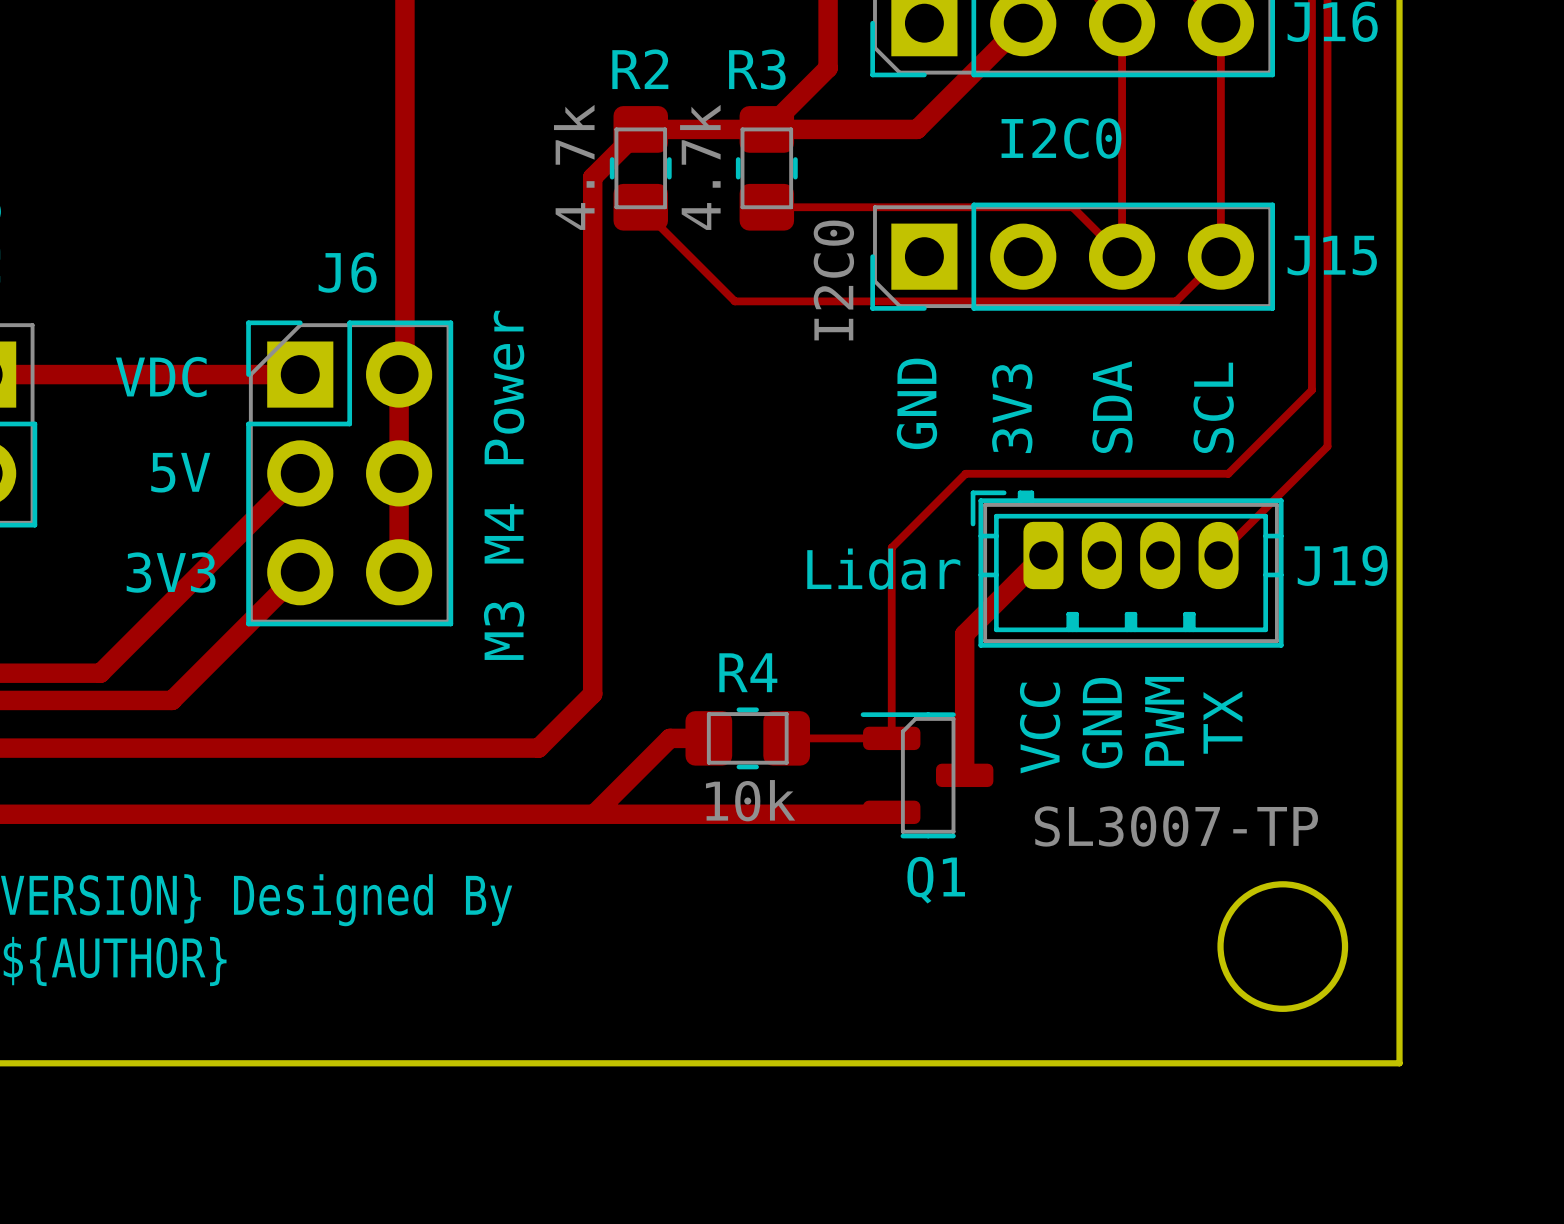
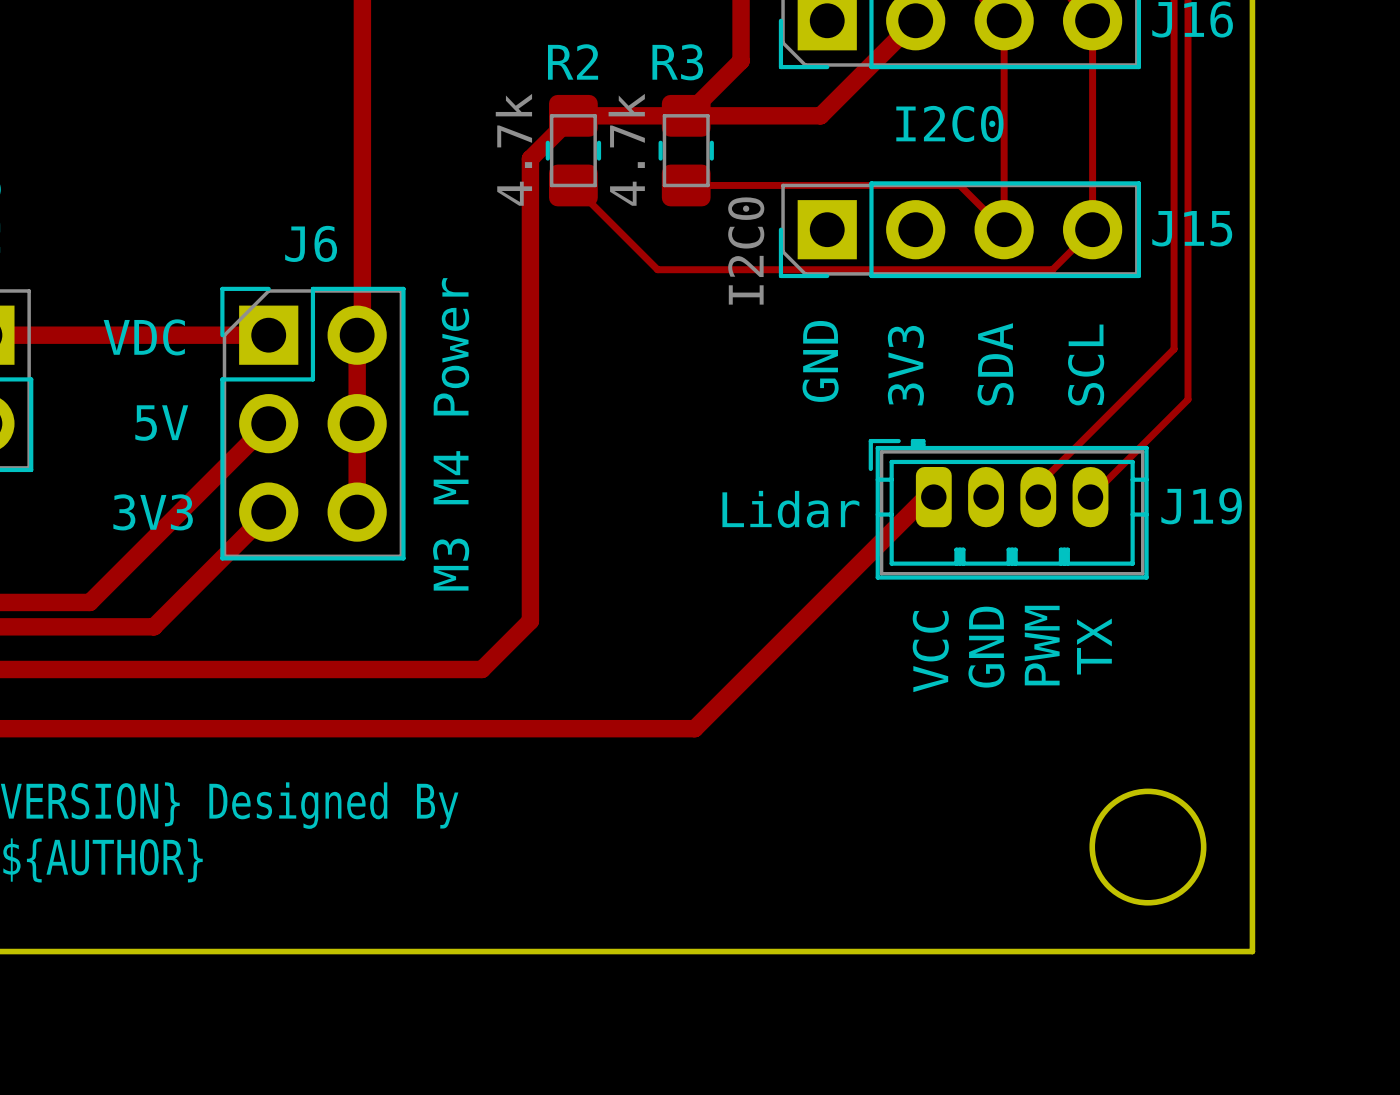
track: (1228, 473) (965, 473) (891, 547) (891, 738) (786, 738) -> (1099, 423) (1038, 484) (1038, 497)
track: (1043, 555) (964, 634) (964, 775) -> (933, 497) (926, 497) (694, 728)
track: (708, 738) (669, 738) (594, 814) -> none
R4: 10k (747, 738) -> none
Q1: SL3007-TP (927, 775) -> none
track: (776, 814) (889, 814) -> none

